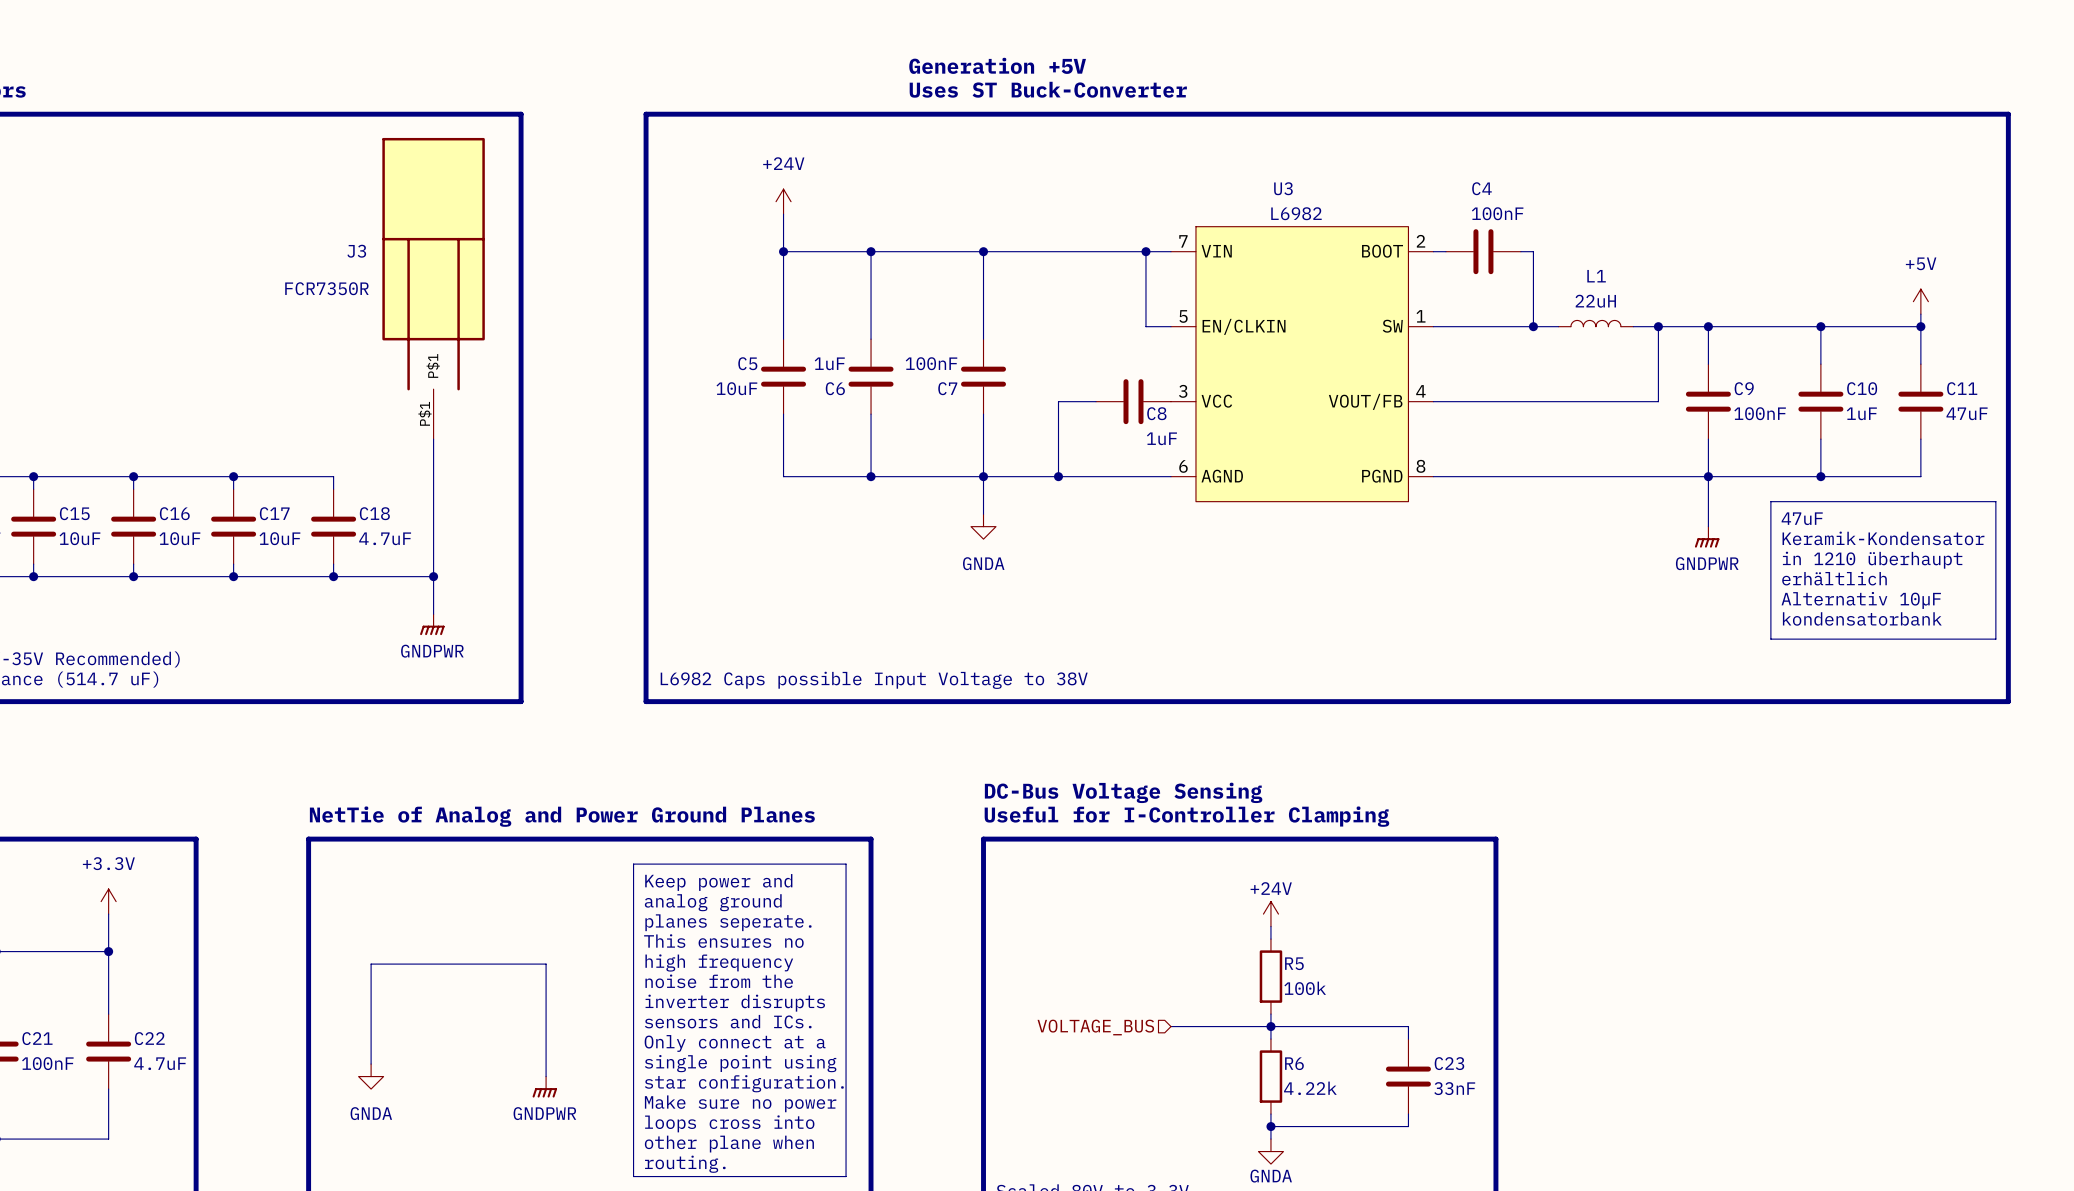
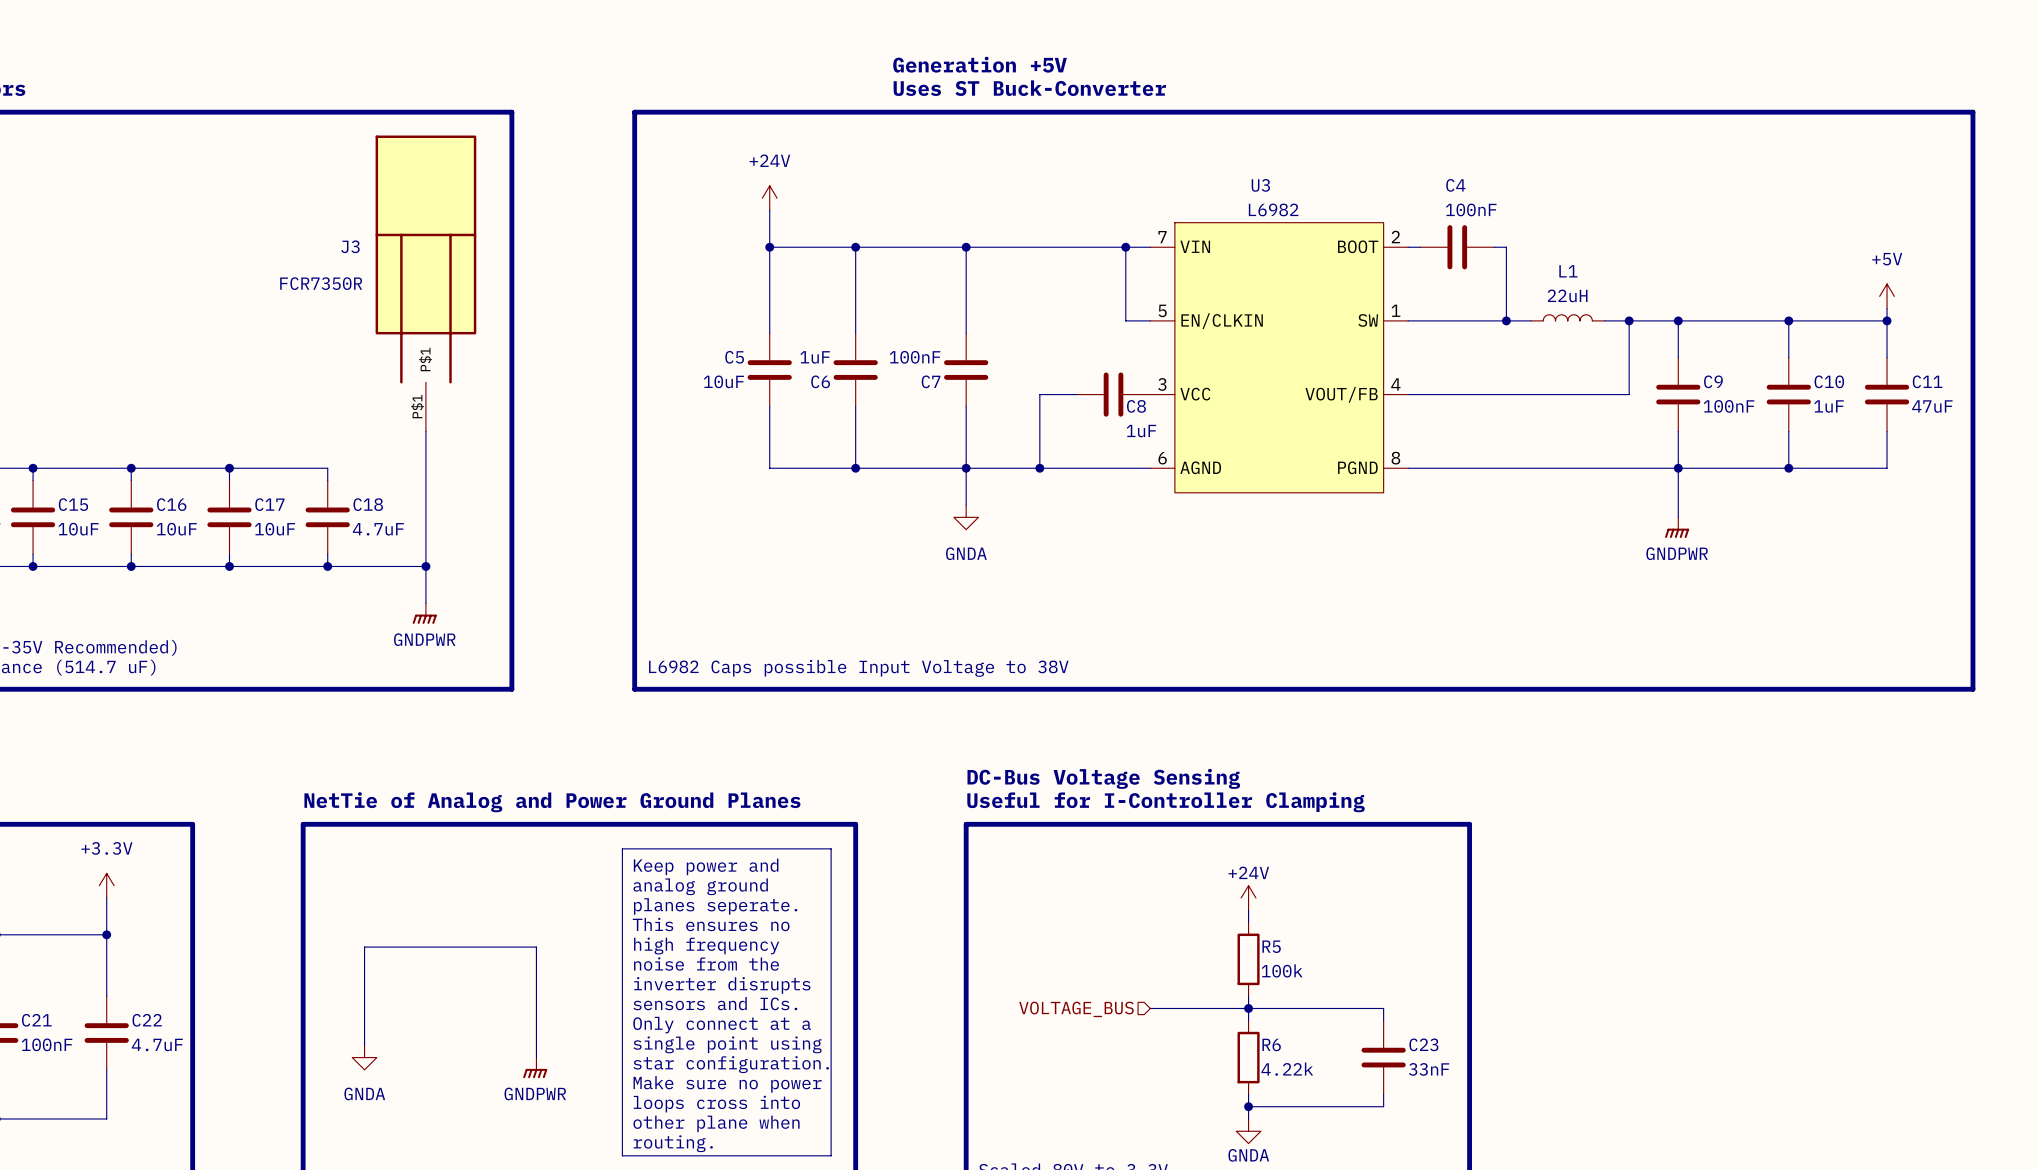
line: (1770, 501) (1995, 501) (1995, 639) (1770, 639) (1770, 501) -> none
text: 47uF (1802, 518) -> none
text: Keramik-Kondensator (1883, 538) -> none
text: in 1210 überhaupt (1872, 560) -> none
text: erhältlich (1834, 578) -> none
text: Alternativ 10µF (1861, 600) -> none
text: kondensatorbank (1862, 618) -> none

